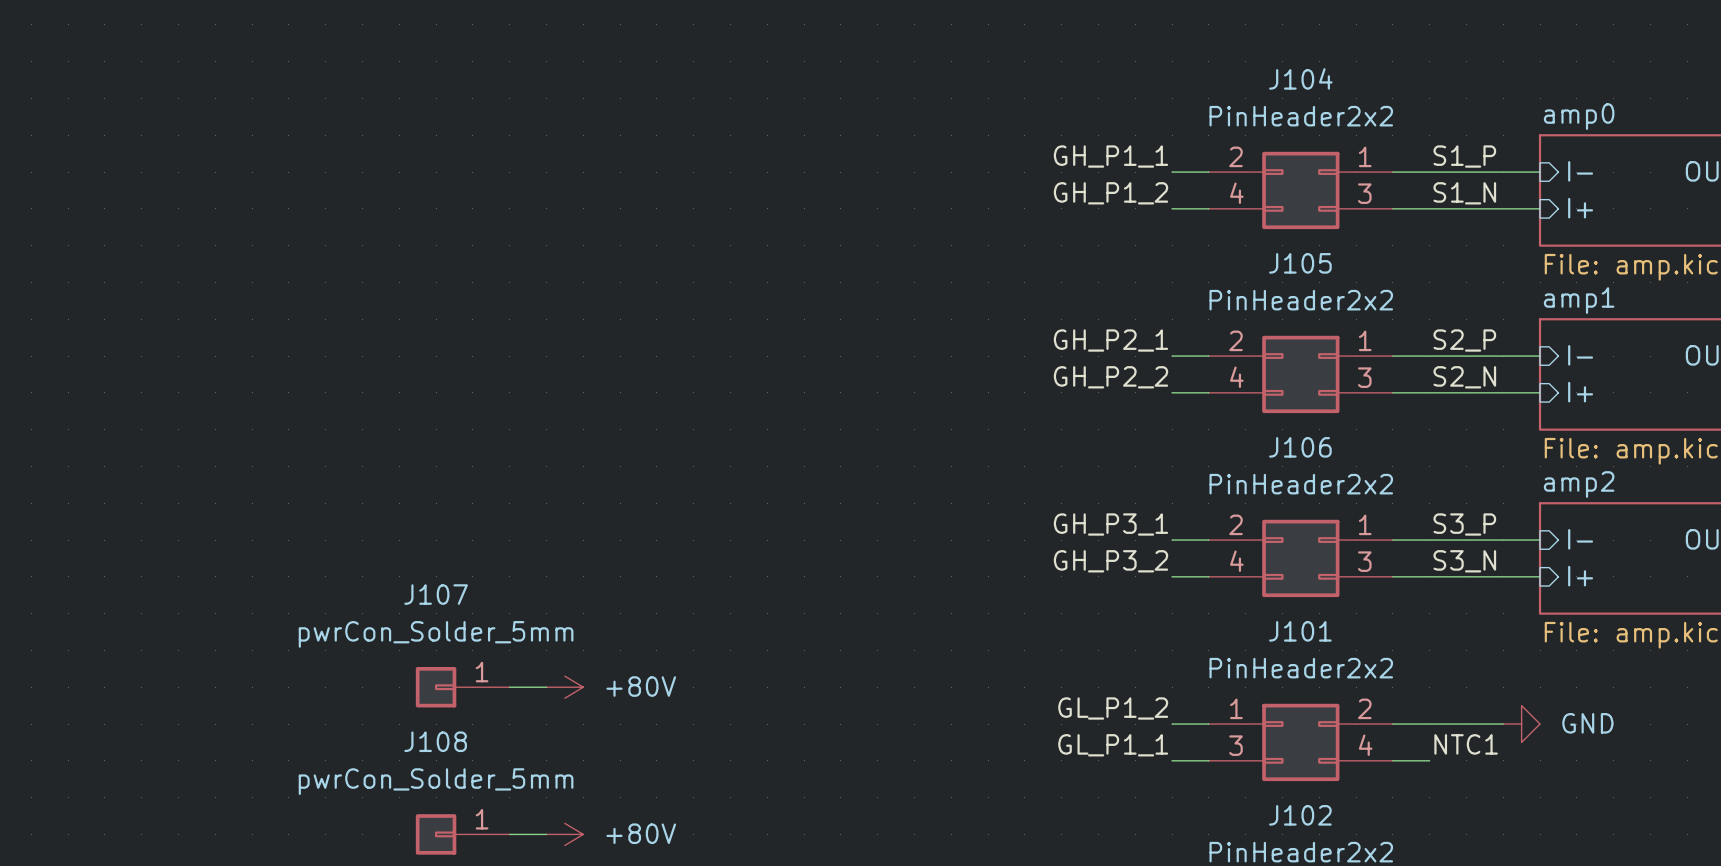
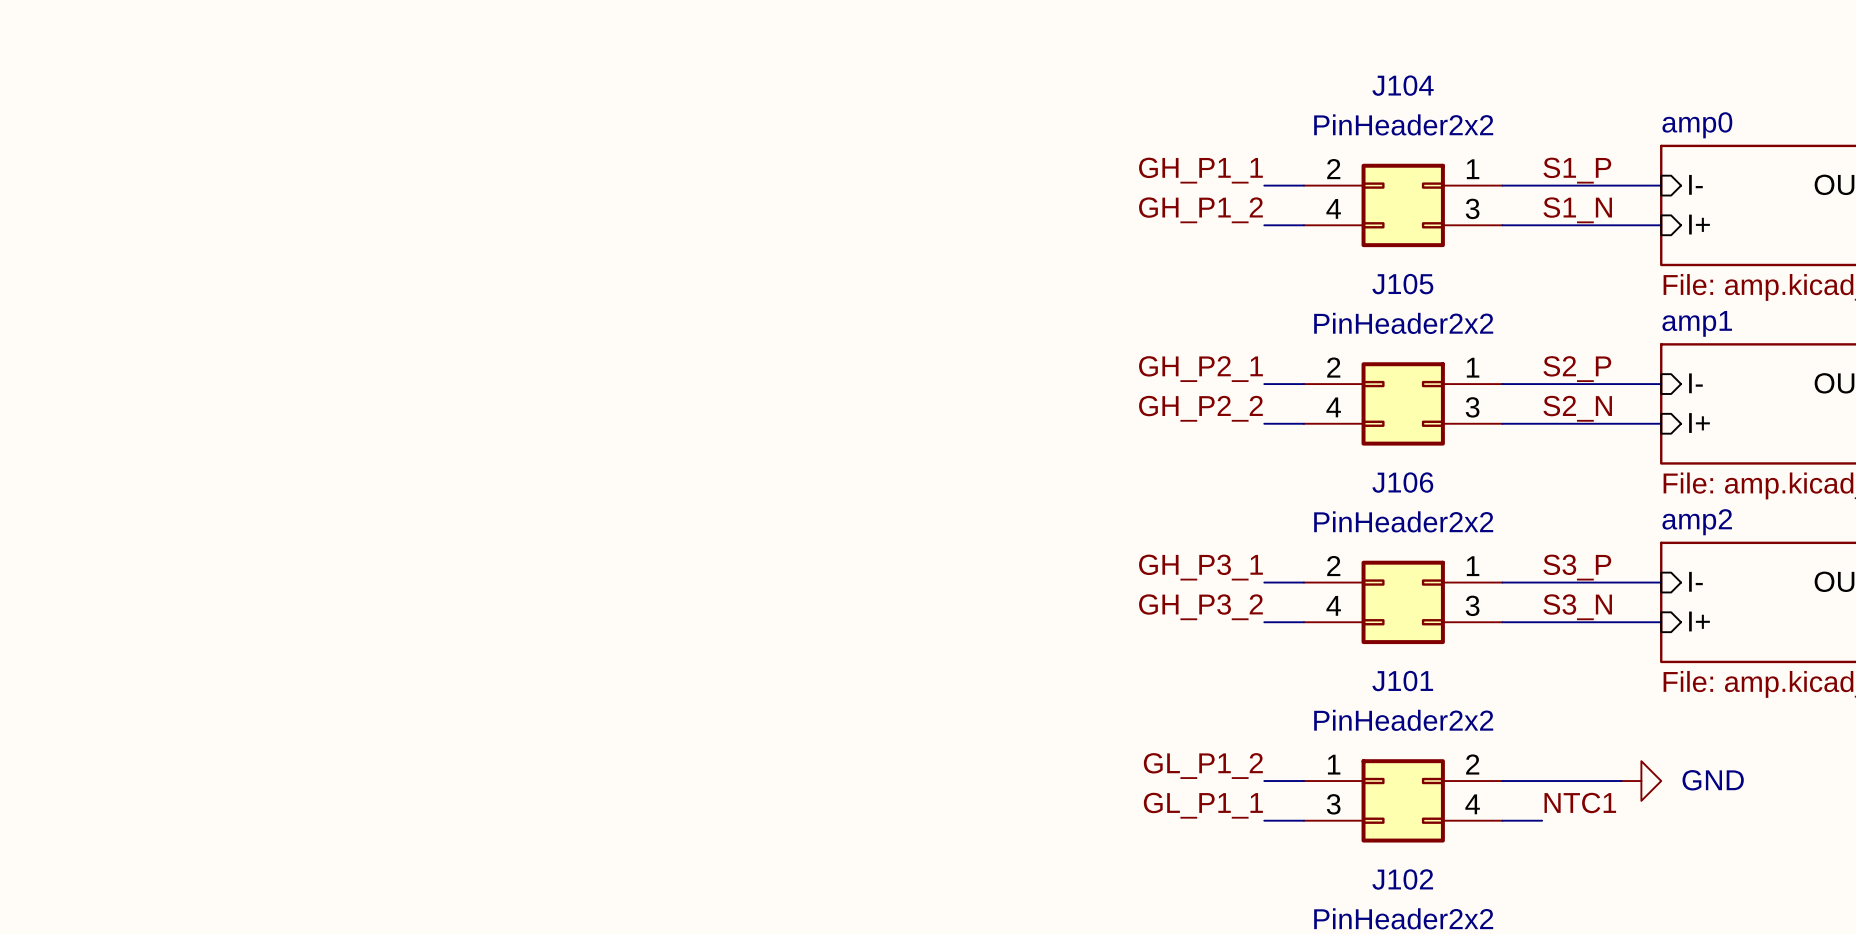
J107: pwrCon_Solder_5mm (462, 687) -> none
wire: (509, 687) (546, 687) -> none
power symbol: +80V (564, 687) -> none
J108: pwrCon_Solder_5mm (462, 834) -> none
wire: (509, 834) (546, 834) -> none
power symbol: +80V (564, 834) -> none

